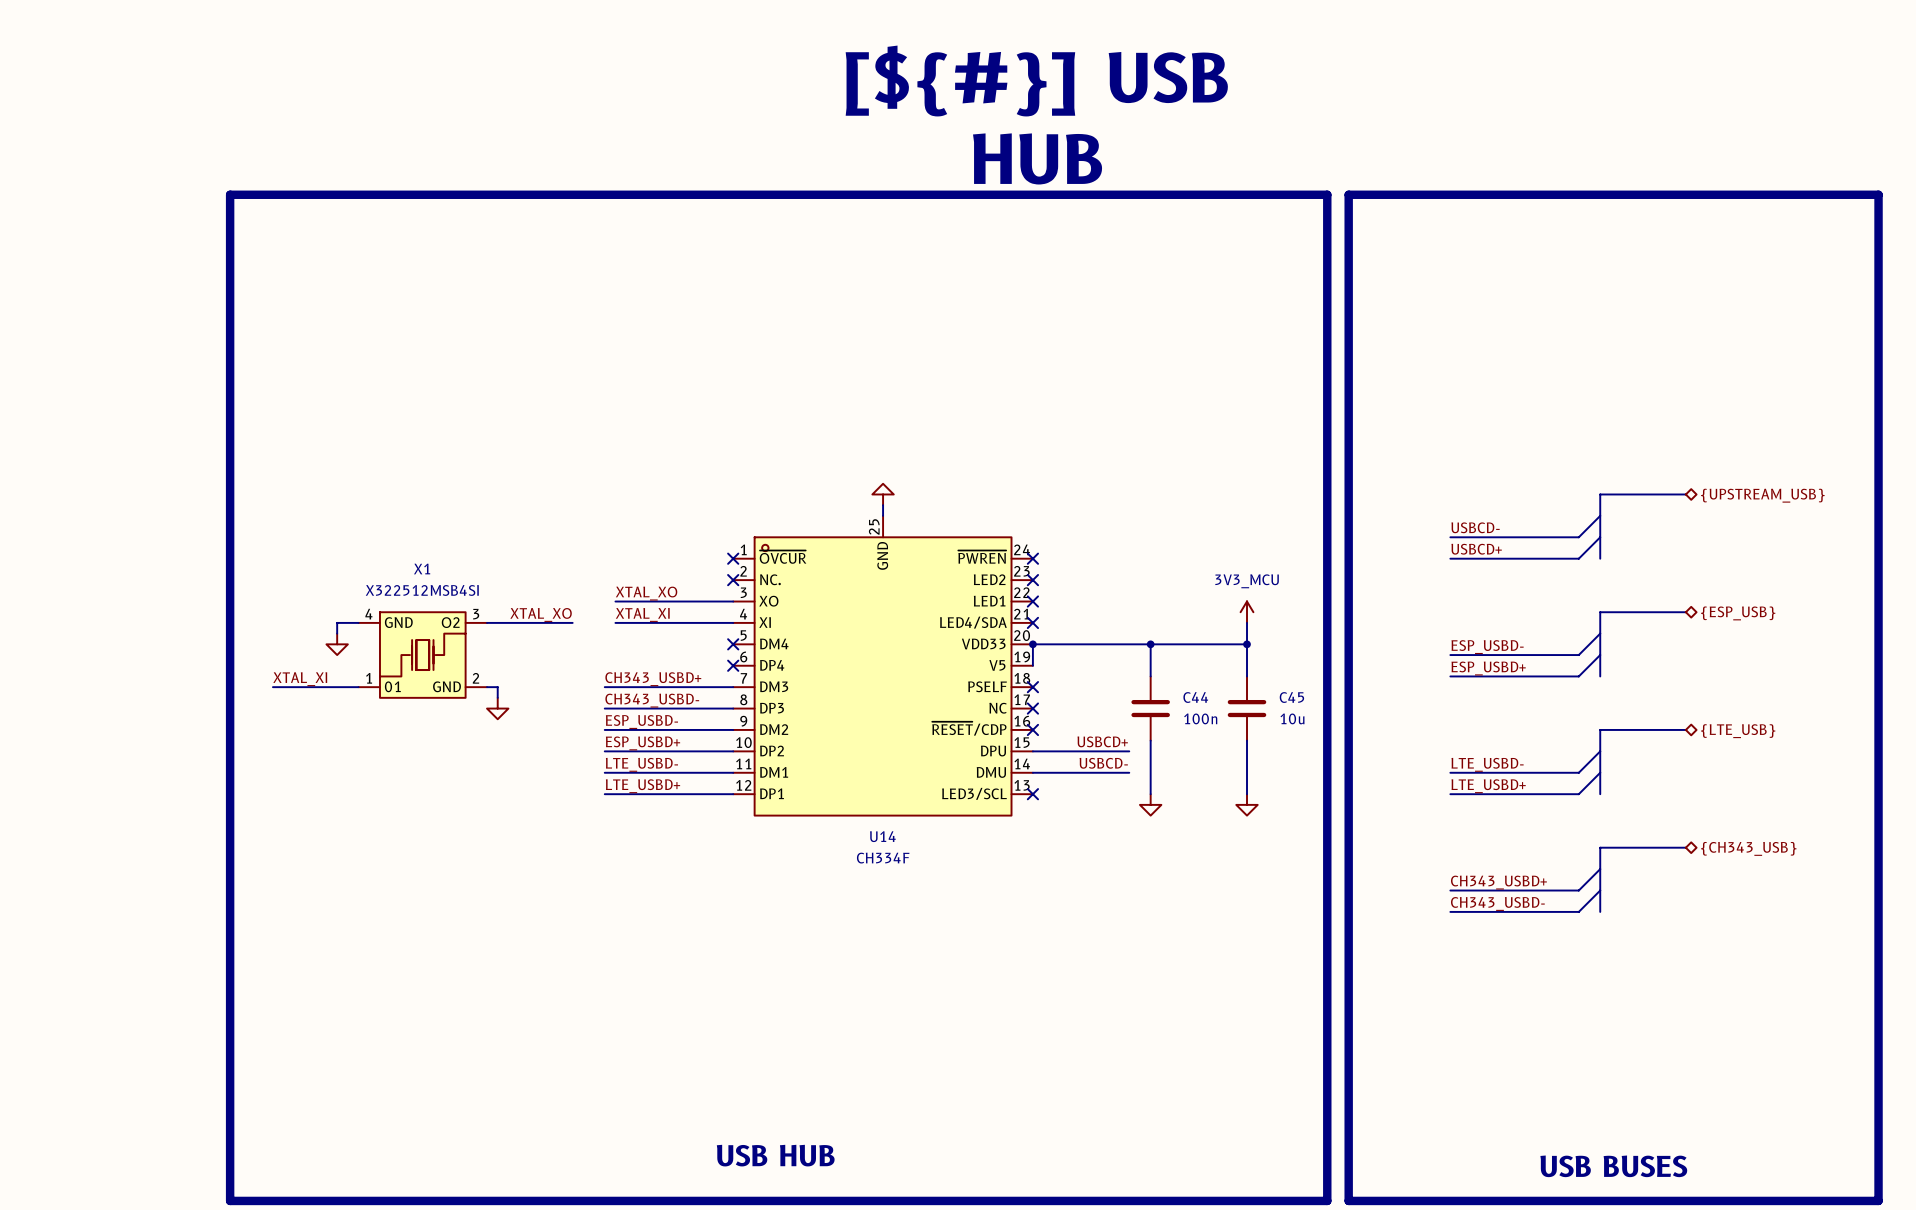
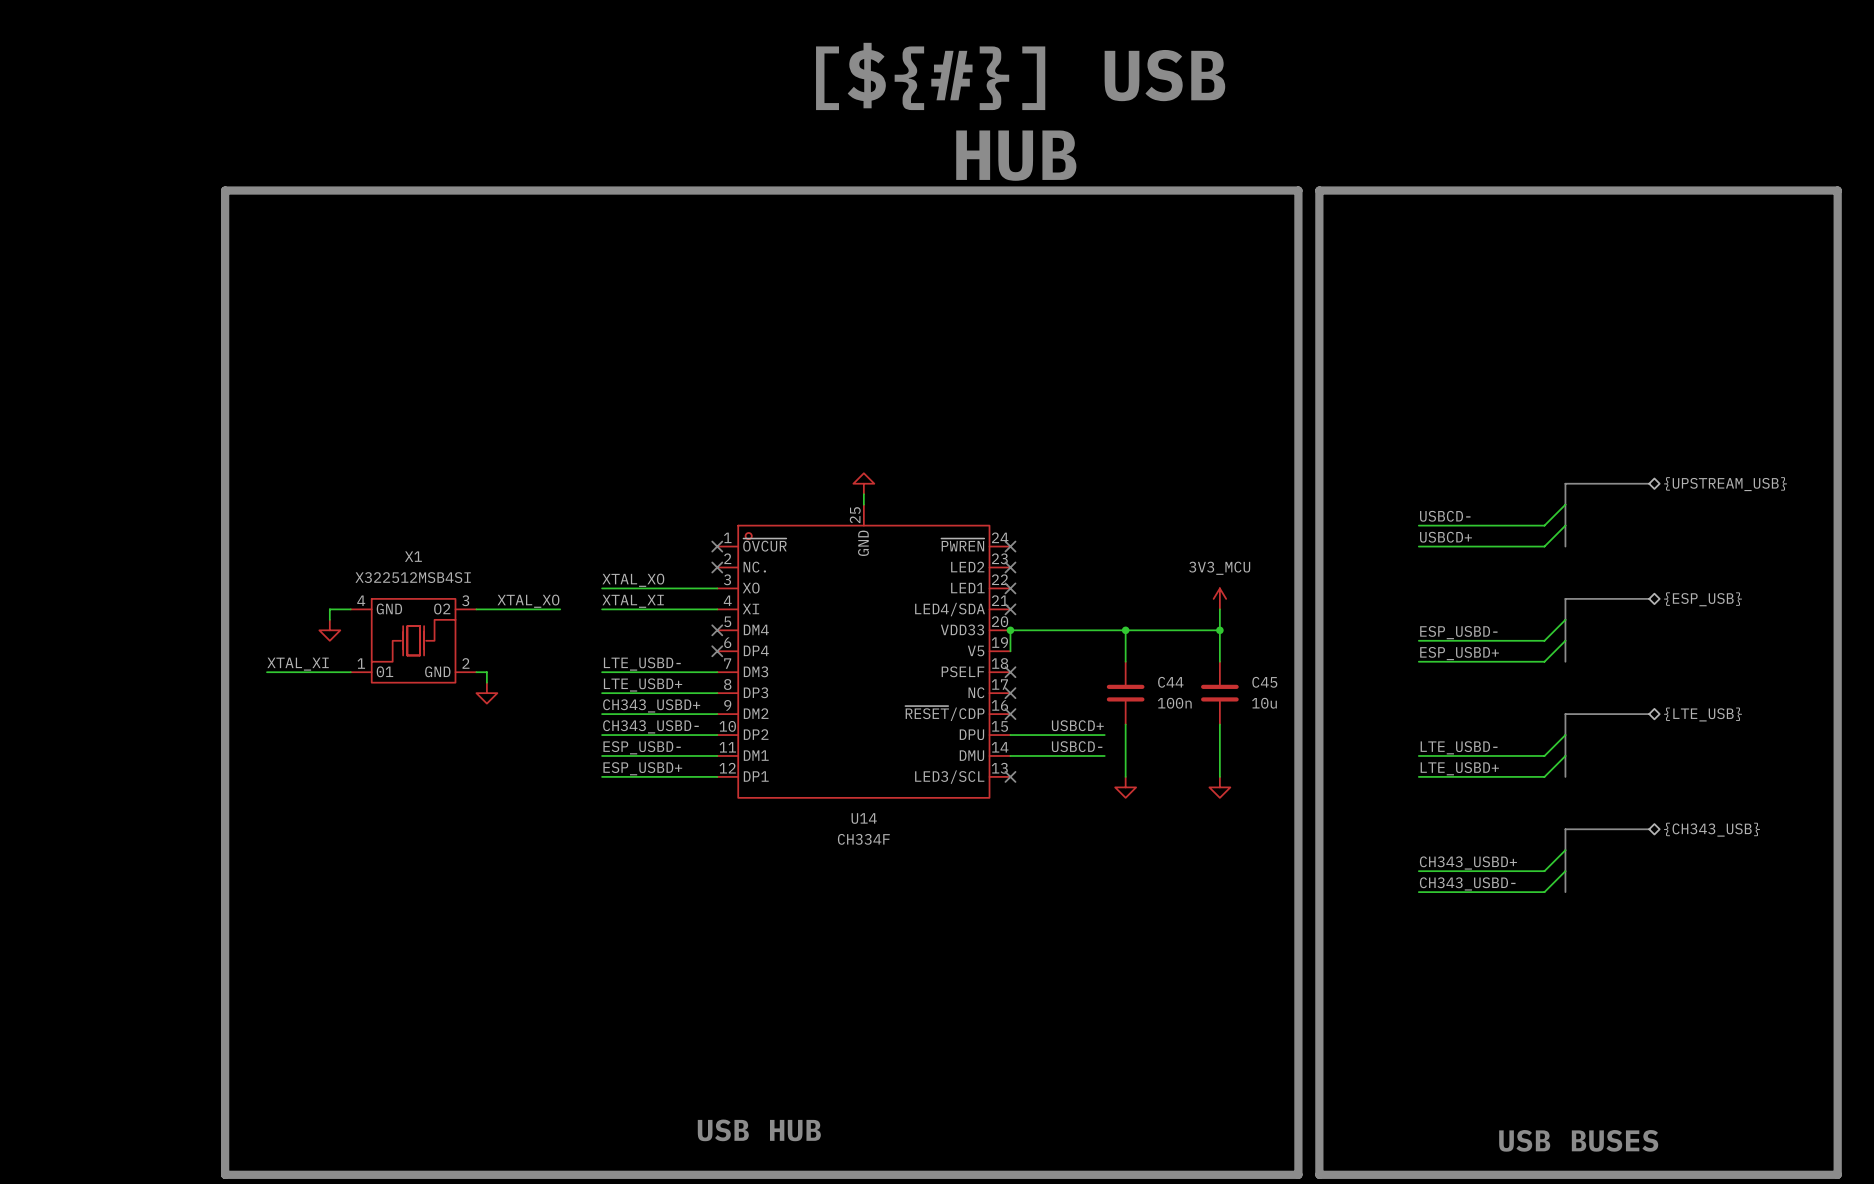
label position: CH343_USBD+ (653, 679) -> CH343_USBD+ (651, 705)
wire: (604, 687) (615, 687) -> none
label position: CH343_USBD- (652, 700) -> CH343_USBD- (650, 726)
wire: (604, 708) (615, 708) -> none
label position: ESP_USBD- (641, 722) -> ESP_USBD- (642, 747)
wire: (604, 729) (615, 729) -> none
label position: ESP_USBD+ (643, 743) -> ESP_USBD+ (642, 768)
wire: (604, 751) (615, 751) -> none
label position: LTE_USBD- (641, 764) -> LTE_USBD- (642, 664)
wire: (604, 772) (615, 772) -> none
label position: LTE_USBD+ (643, 786) -> LTE_USBD+ (643, 684)
wire: (604, 794) (615, 794) -> none

